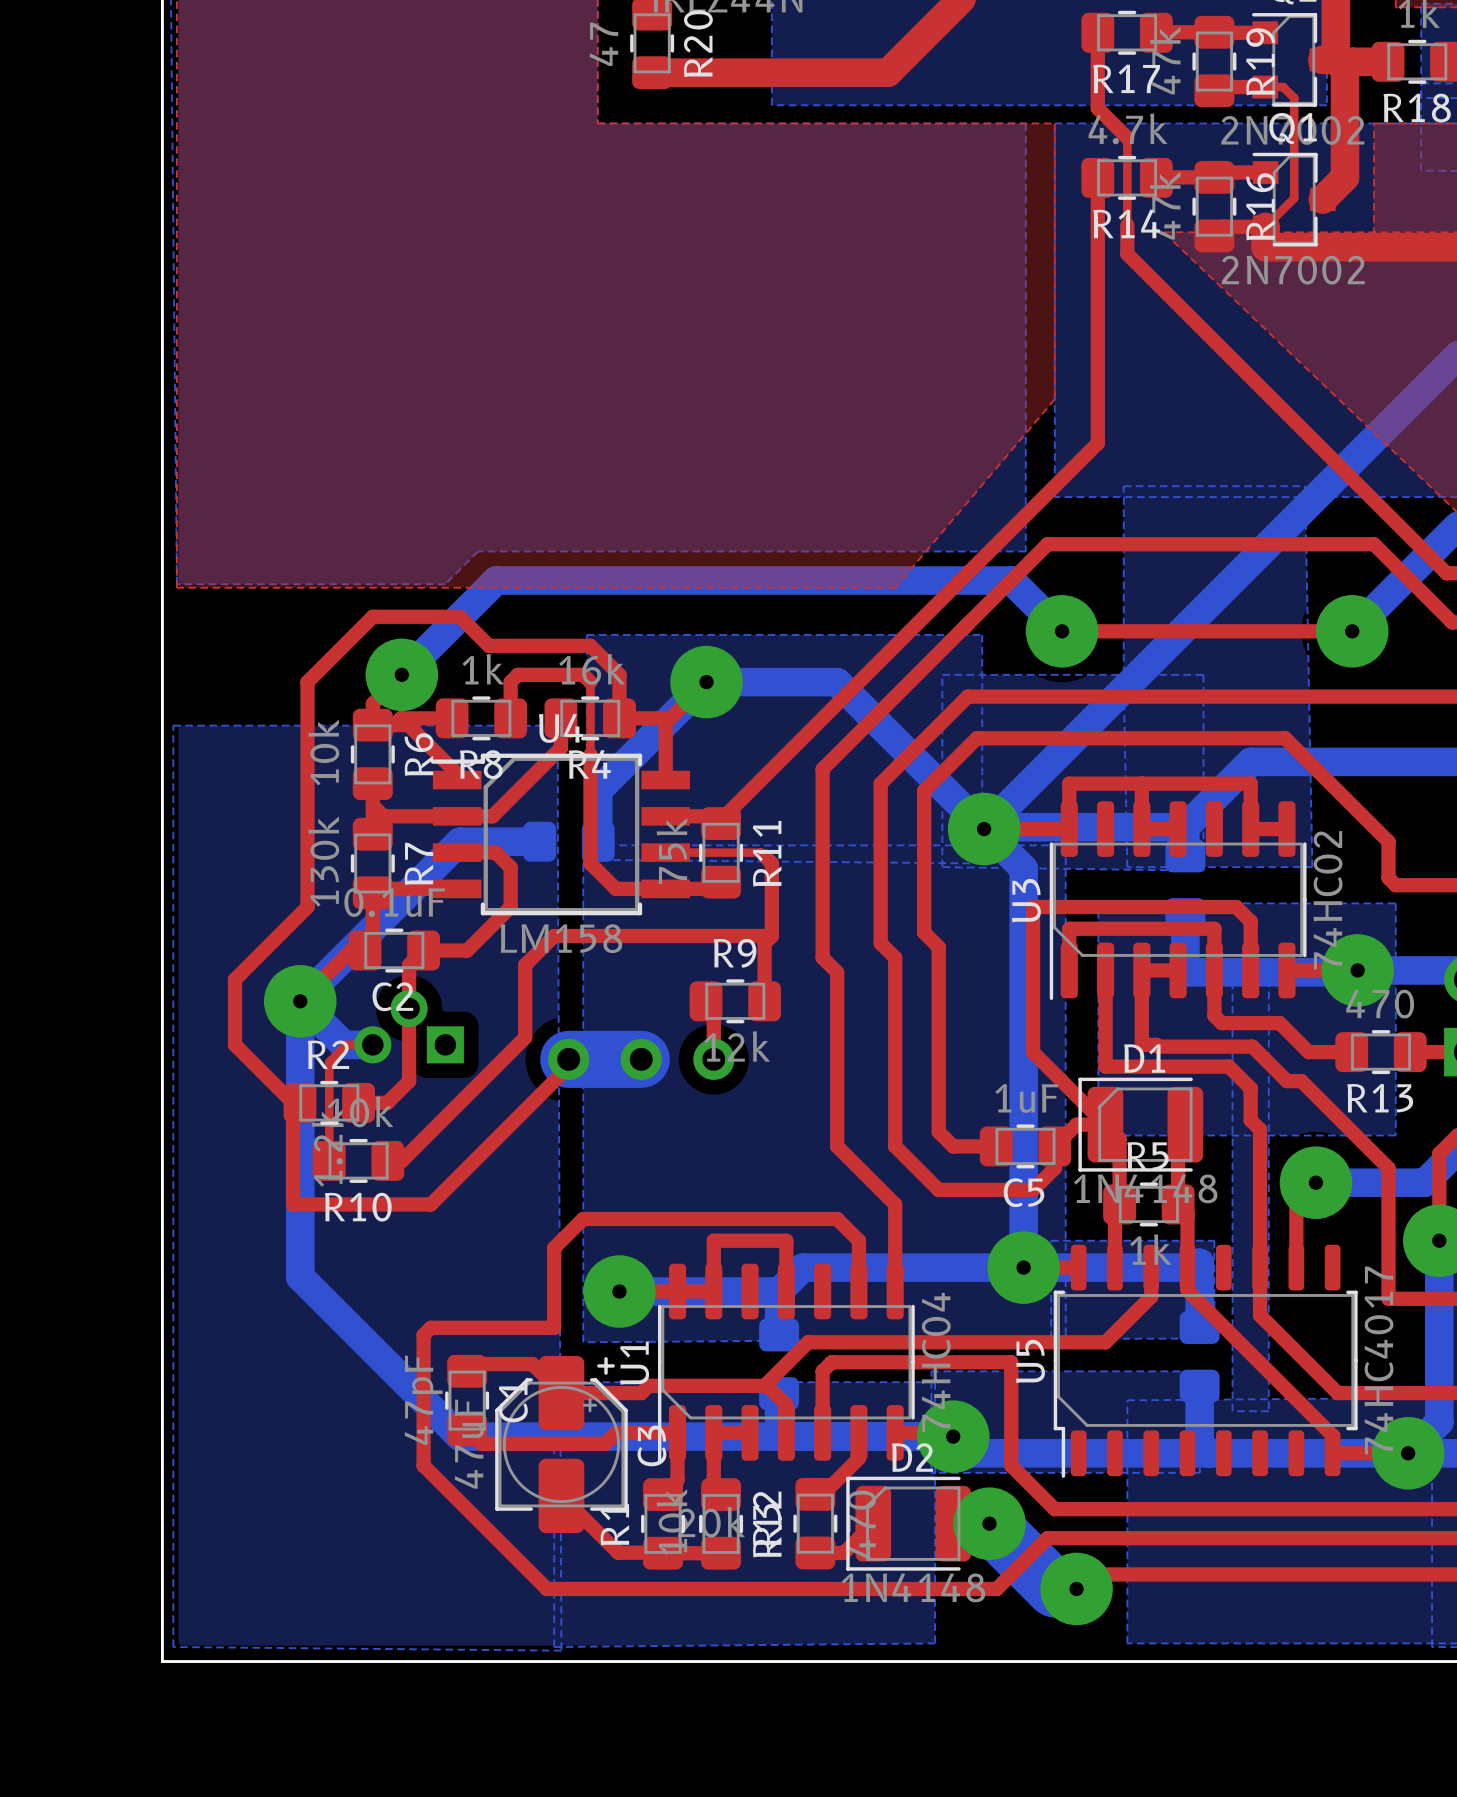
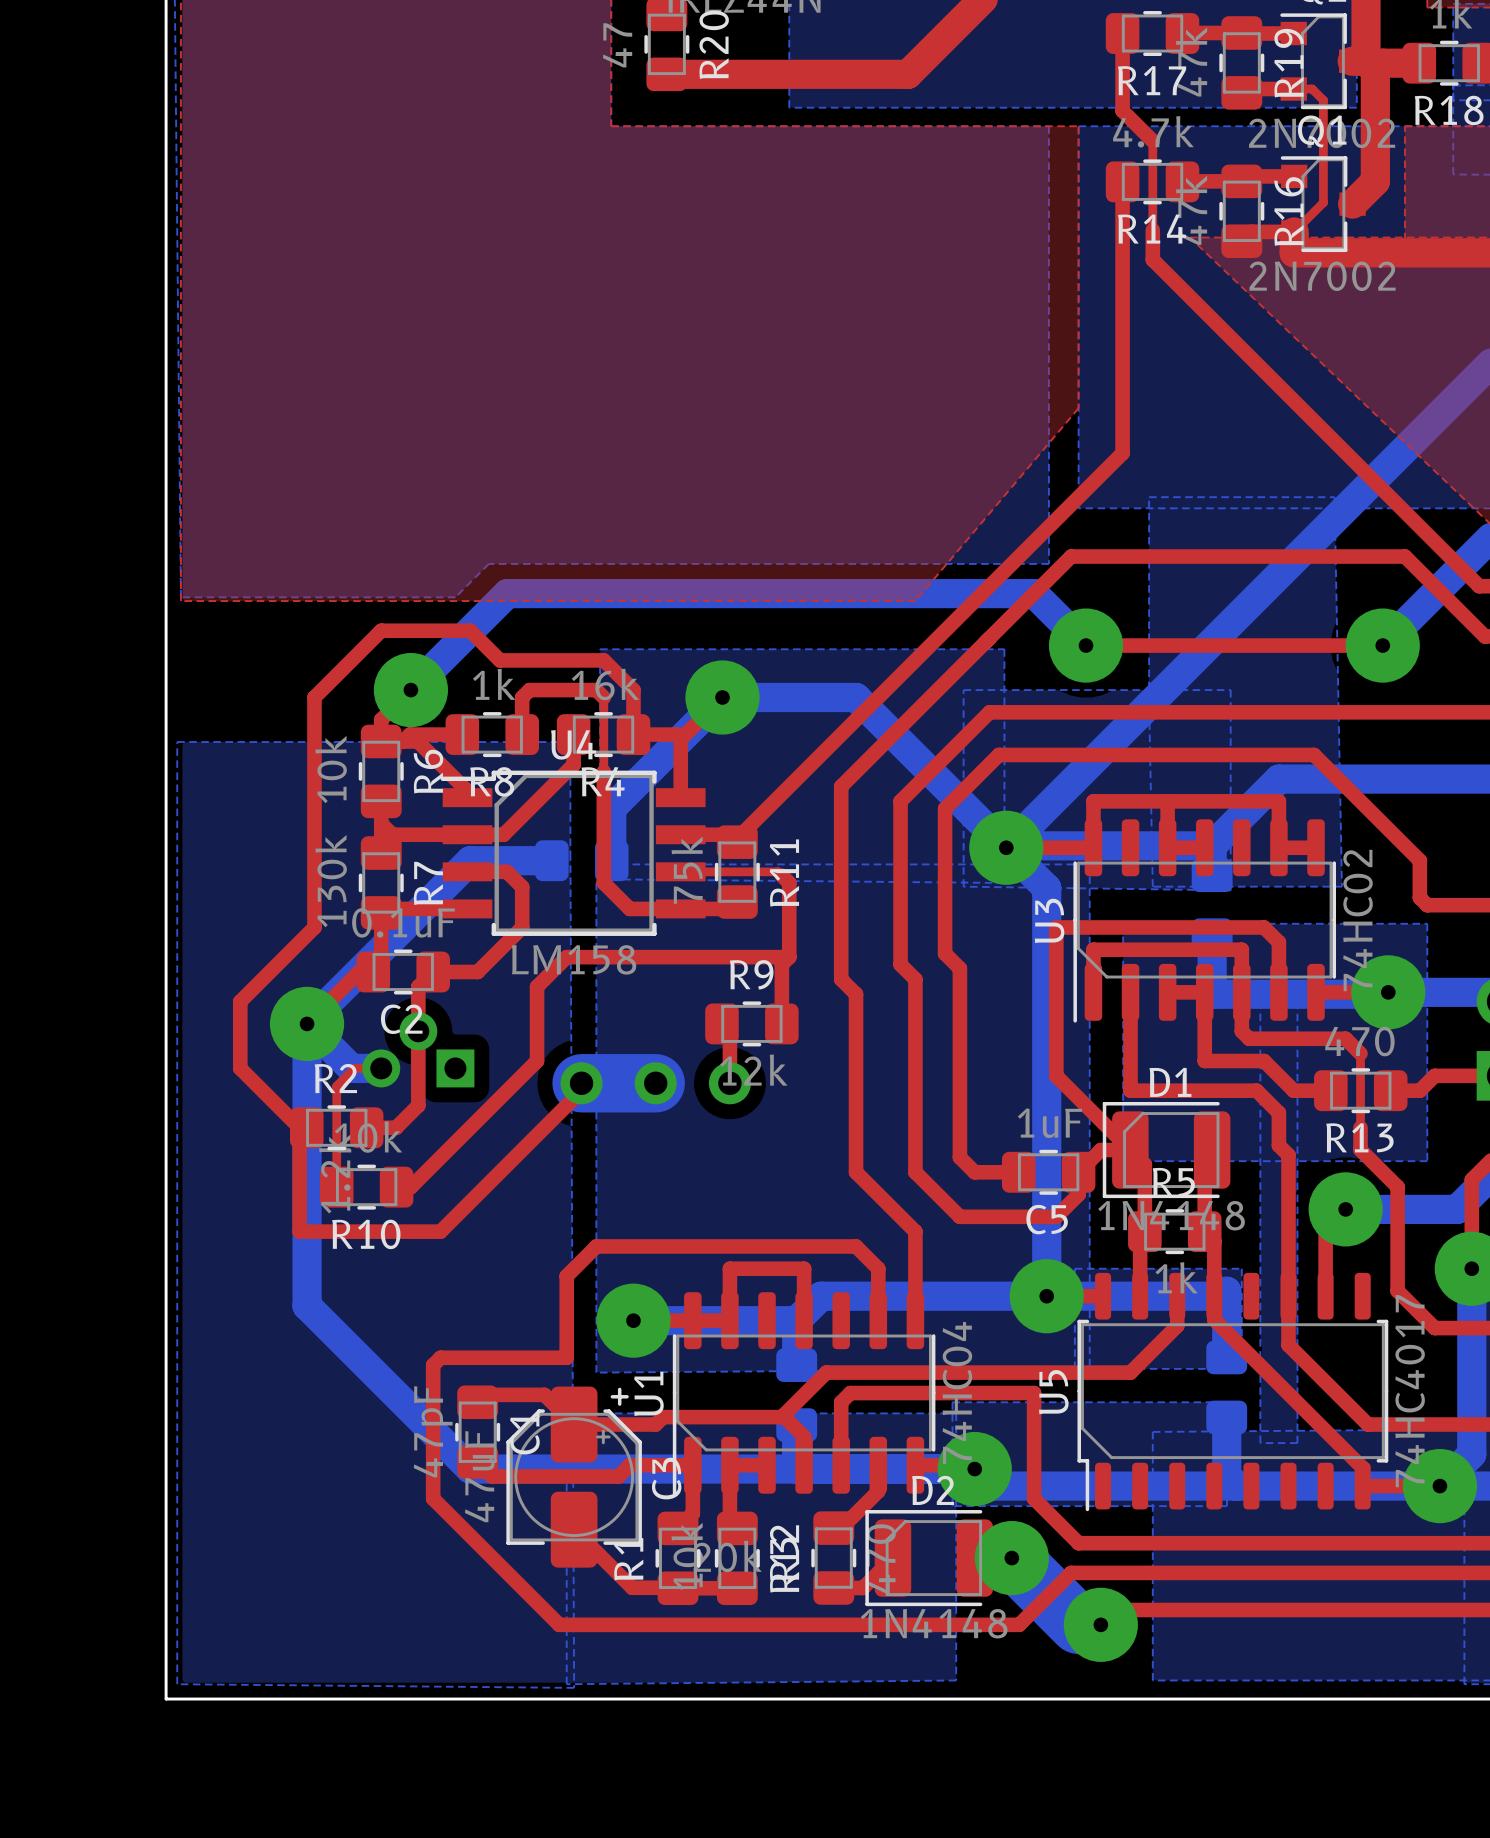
top track: (1141, 970) (1141, 1044) (1156, 1044) (1158, 1046) (1252, 1046) (1286, 1081) (1301, 1081) (1388, 1168) (1388, 1298) (1403, 1298) -> (1241, 1031) (1249, 1038) (1345, 1038) (1360, 1053) (1360, 1149) (1397, 1186) (1397, 1290) (1434, 1328)
top track: none -> (1204, 992) (1204, 1061) (1264, 1061) (1293, 1090) (1330, 1090)
top track: (1214, 1008) (1214, 1015) (1221, 1023) (1279, 1023) (1308, 1052) (1351, 1052) -> none
R13 position: (1381, 1052) -> (1360, 1090)
top track: none -> (1442, 1075) (1434, 1075) (1419, 1090) (1390, 1090)

